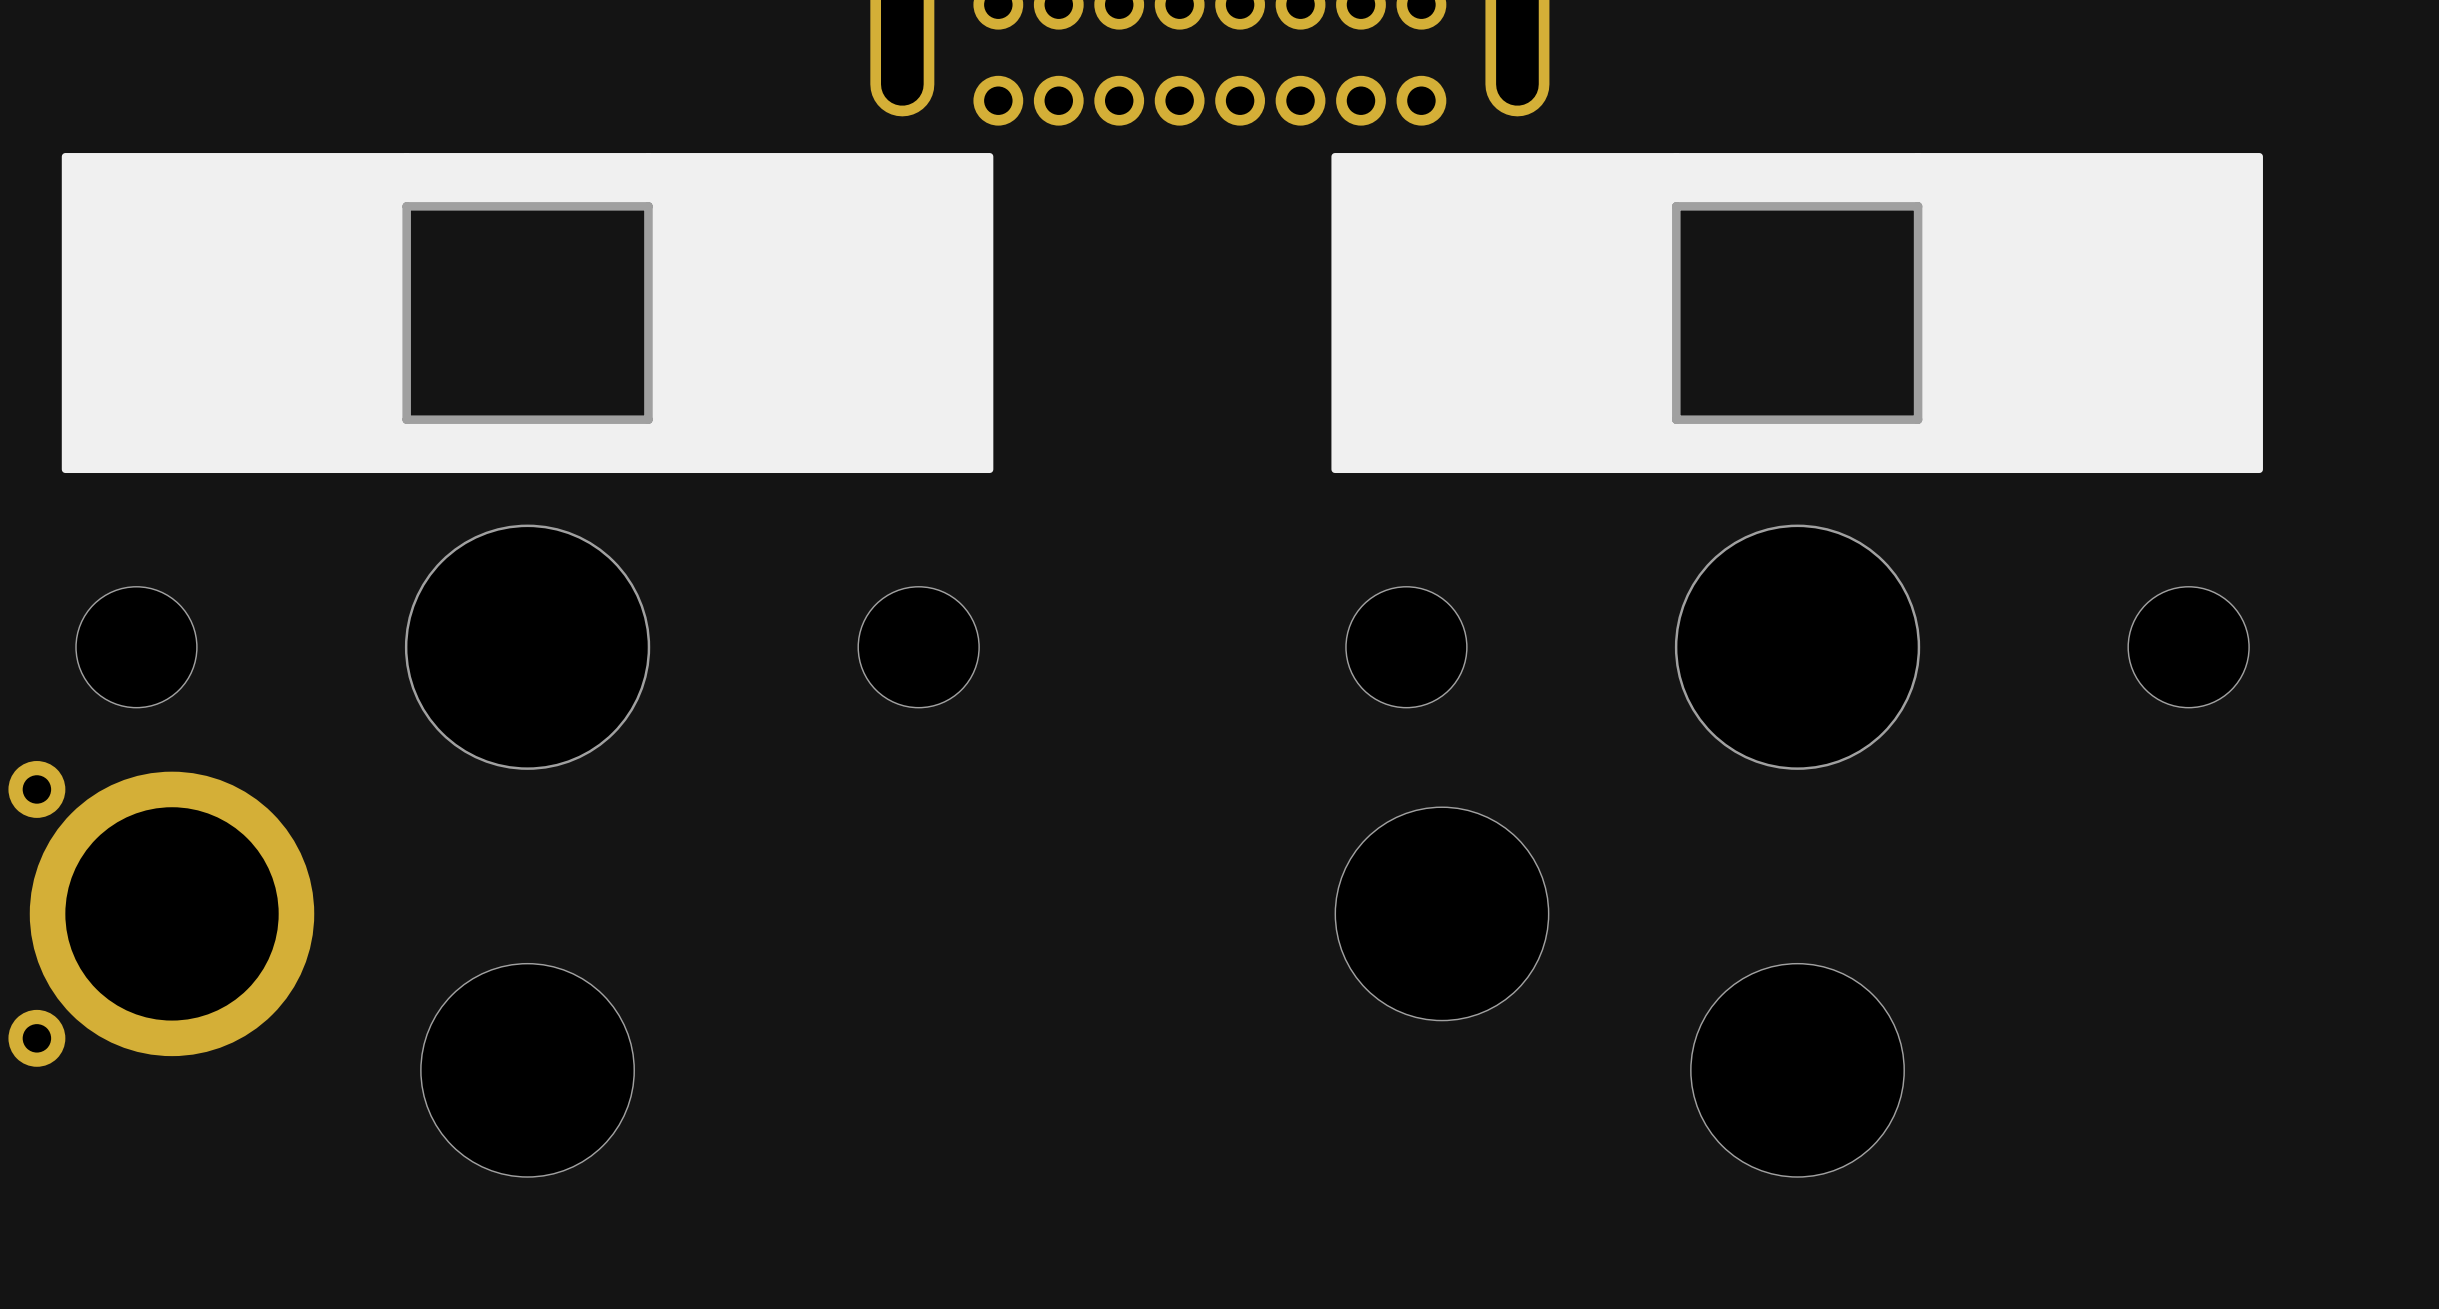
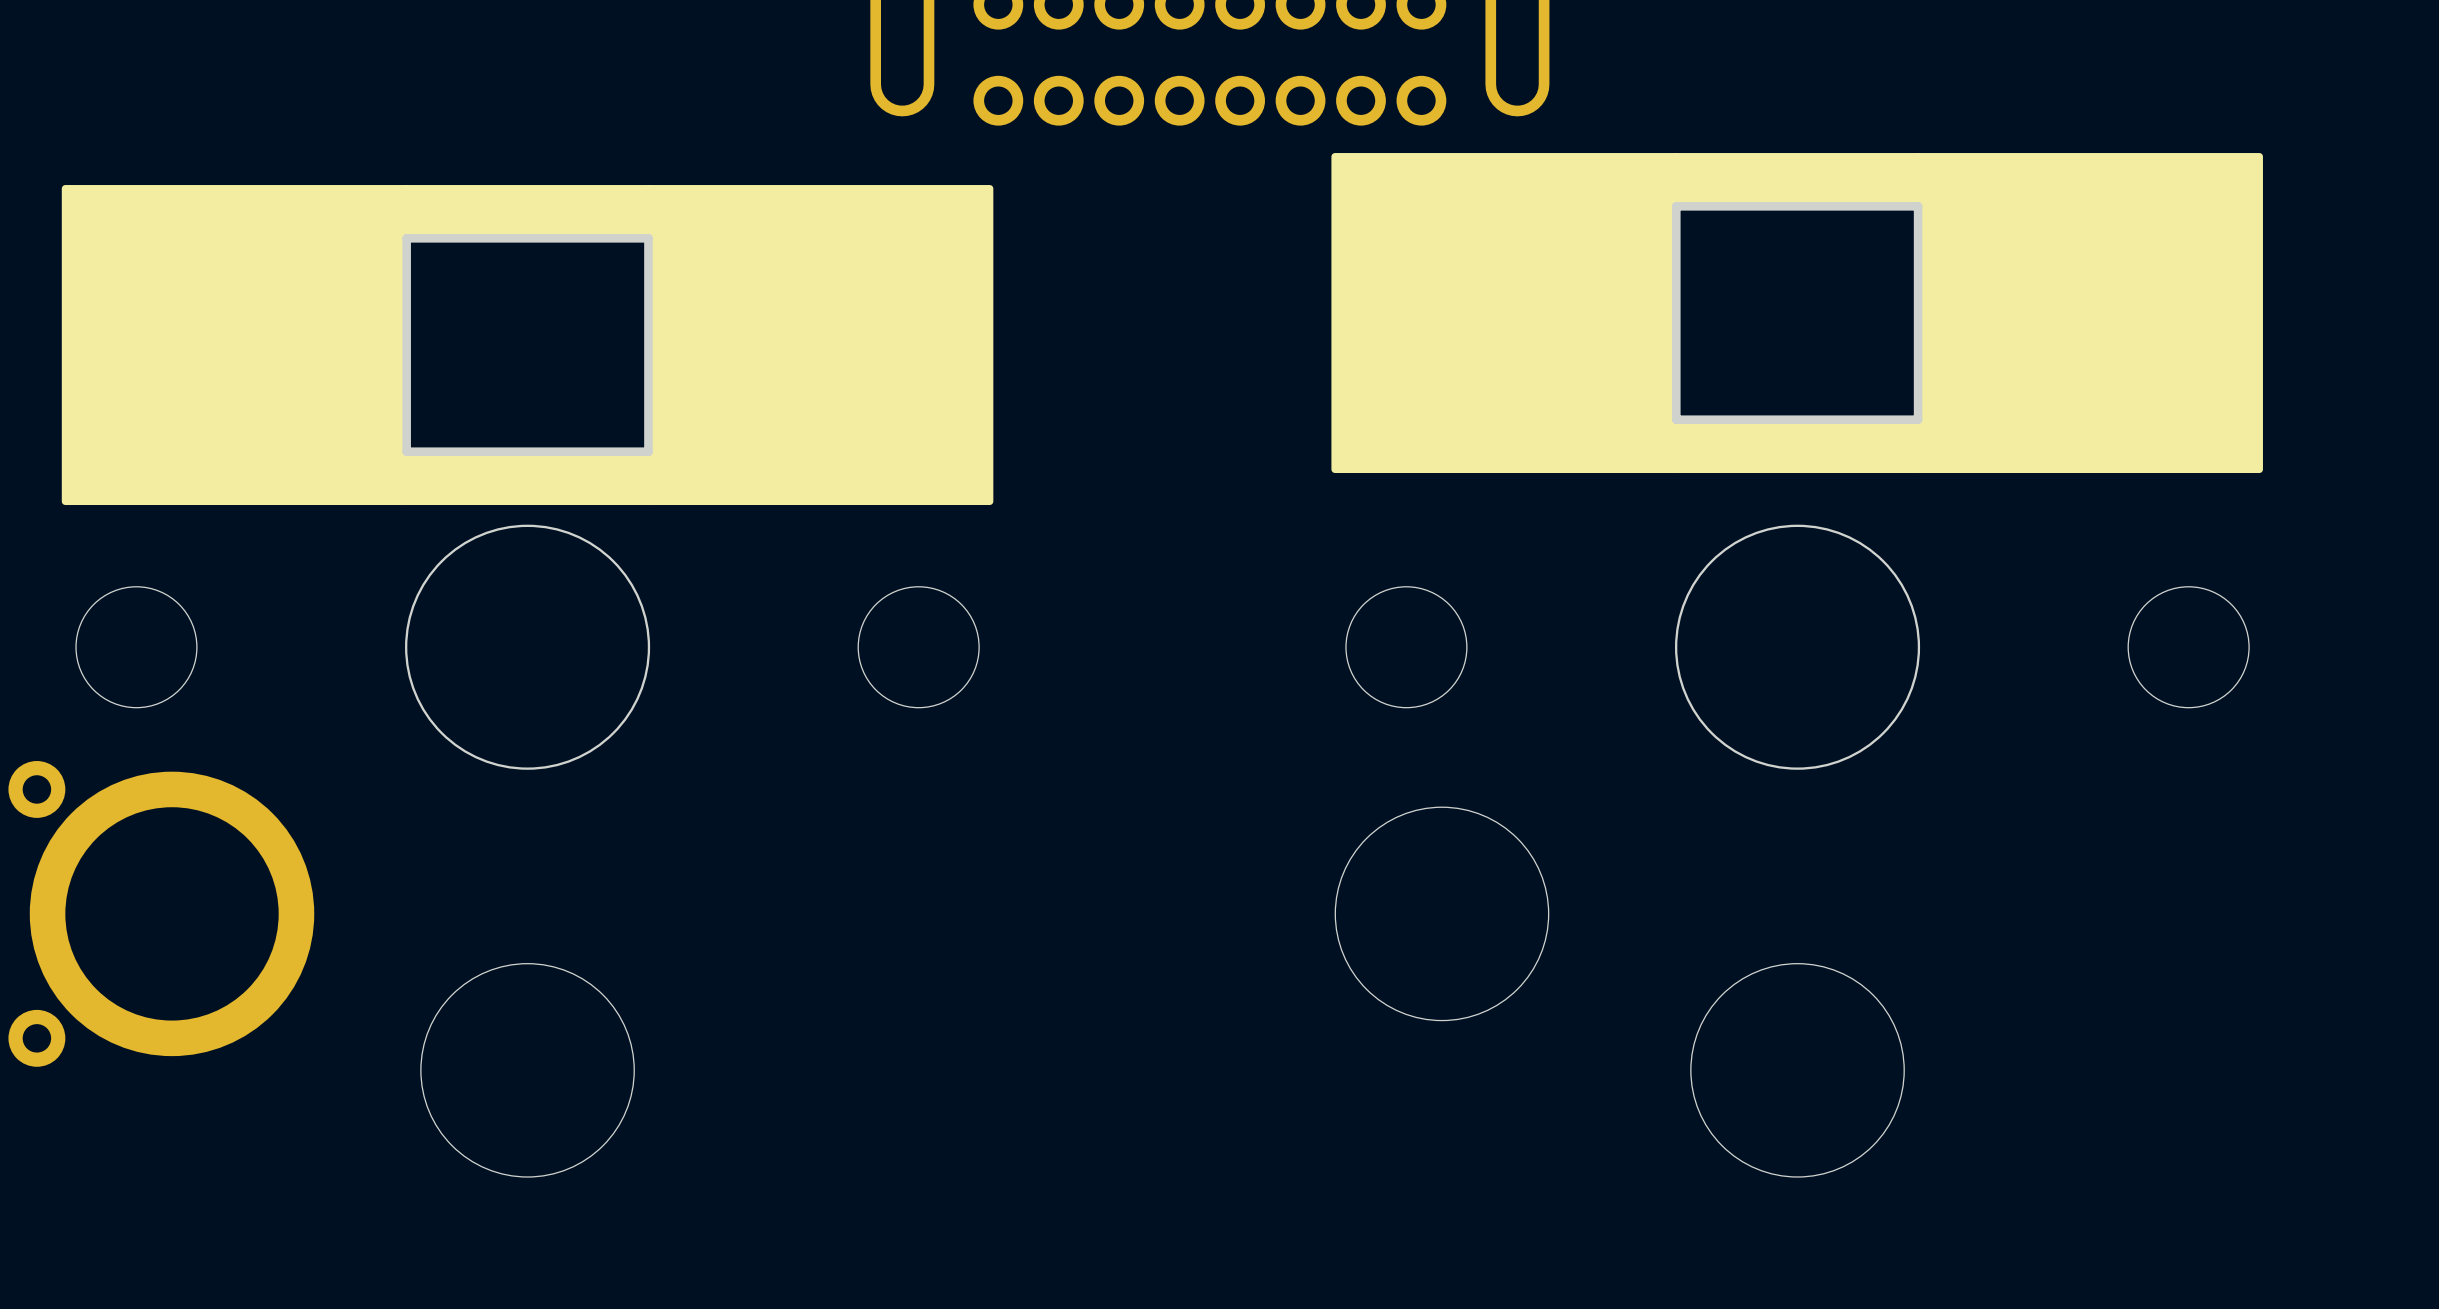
part position: (527, 313) -> (527, 345)

